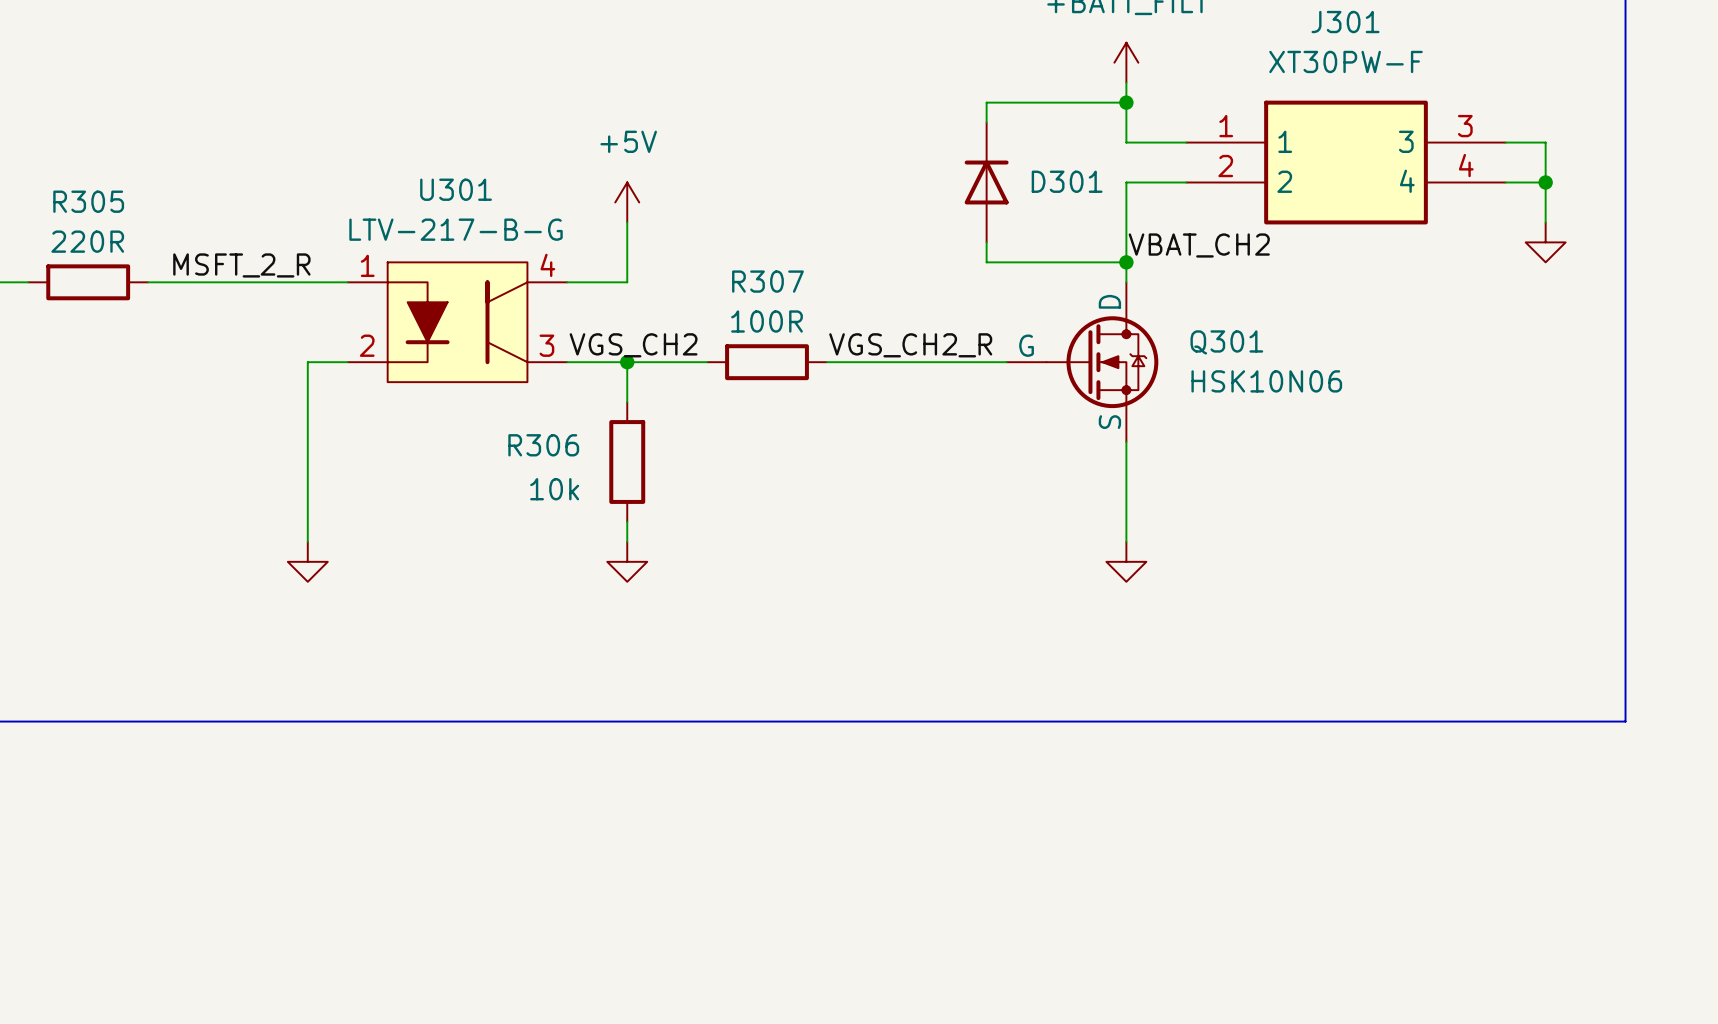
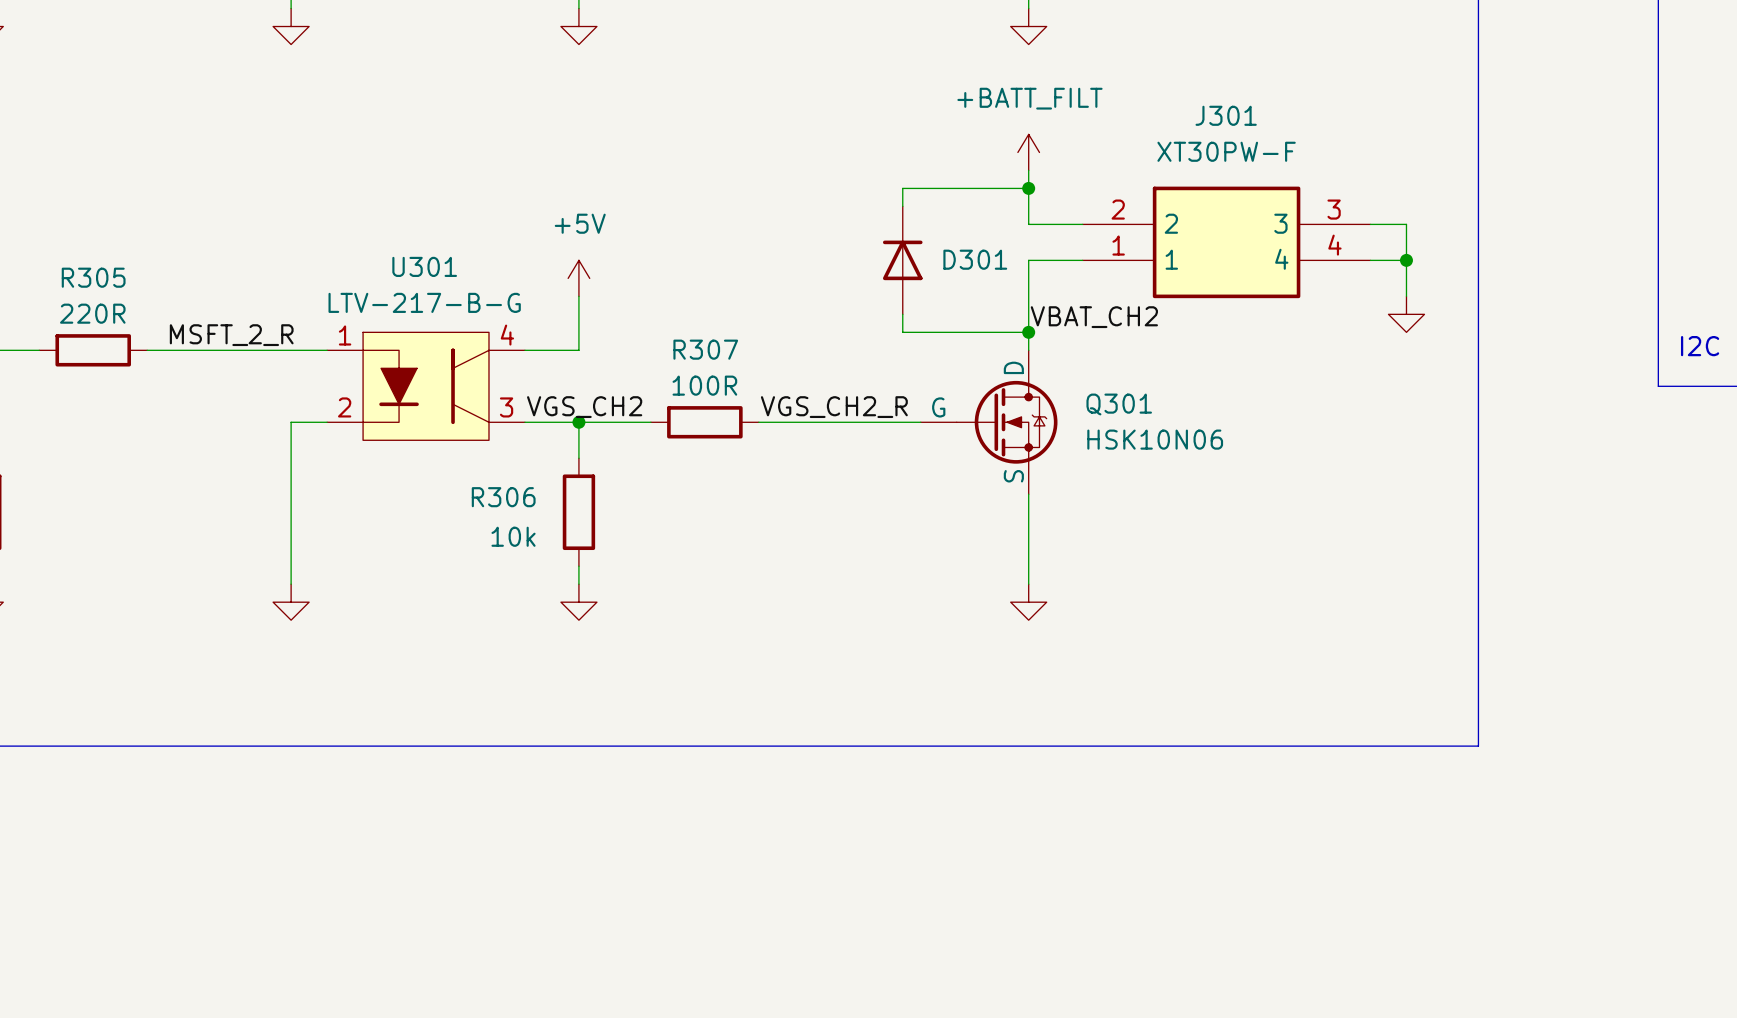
J301 pin number: 1 (1226, 126) -> 2 (1118, 209)
J301 pin name: 1 (1285, 141) -> 2 (1171, 223)
J301 pin number: 2 (1225, 166) -> 1 (1118, 245)
J301 pin name: 2 (1284, 181) -> 1 (1171, 259)

